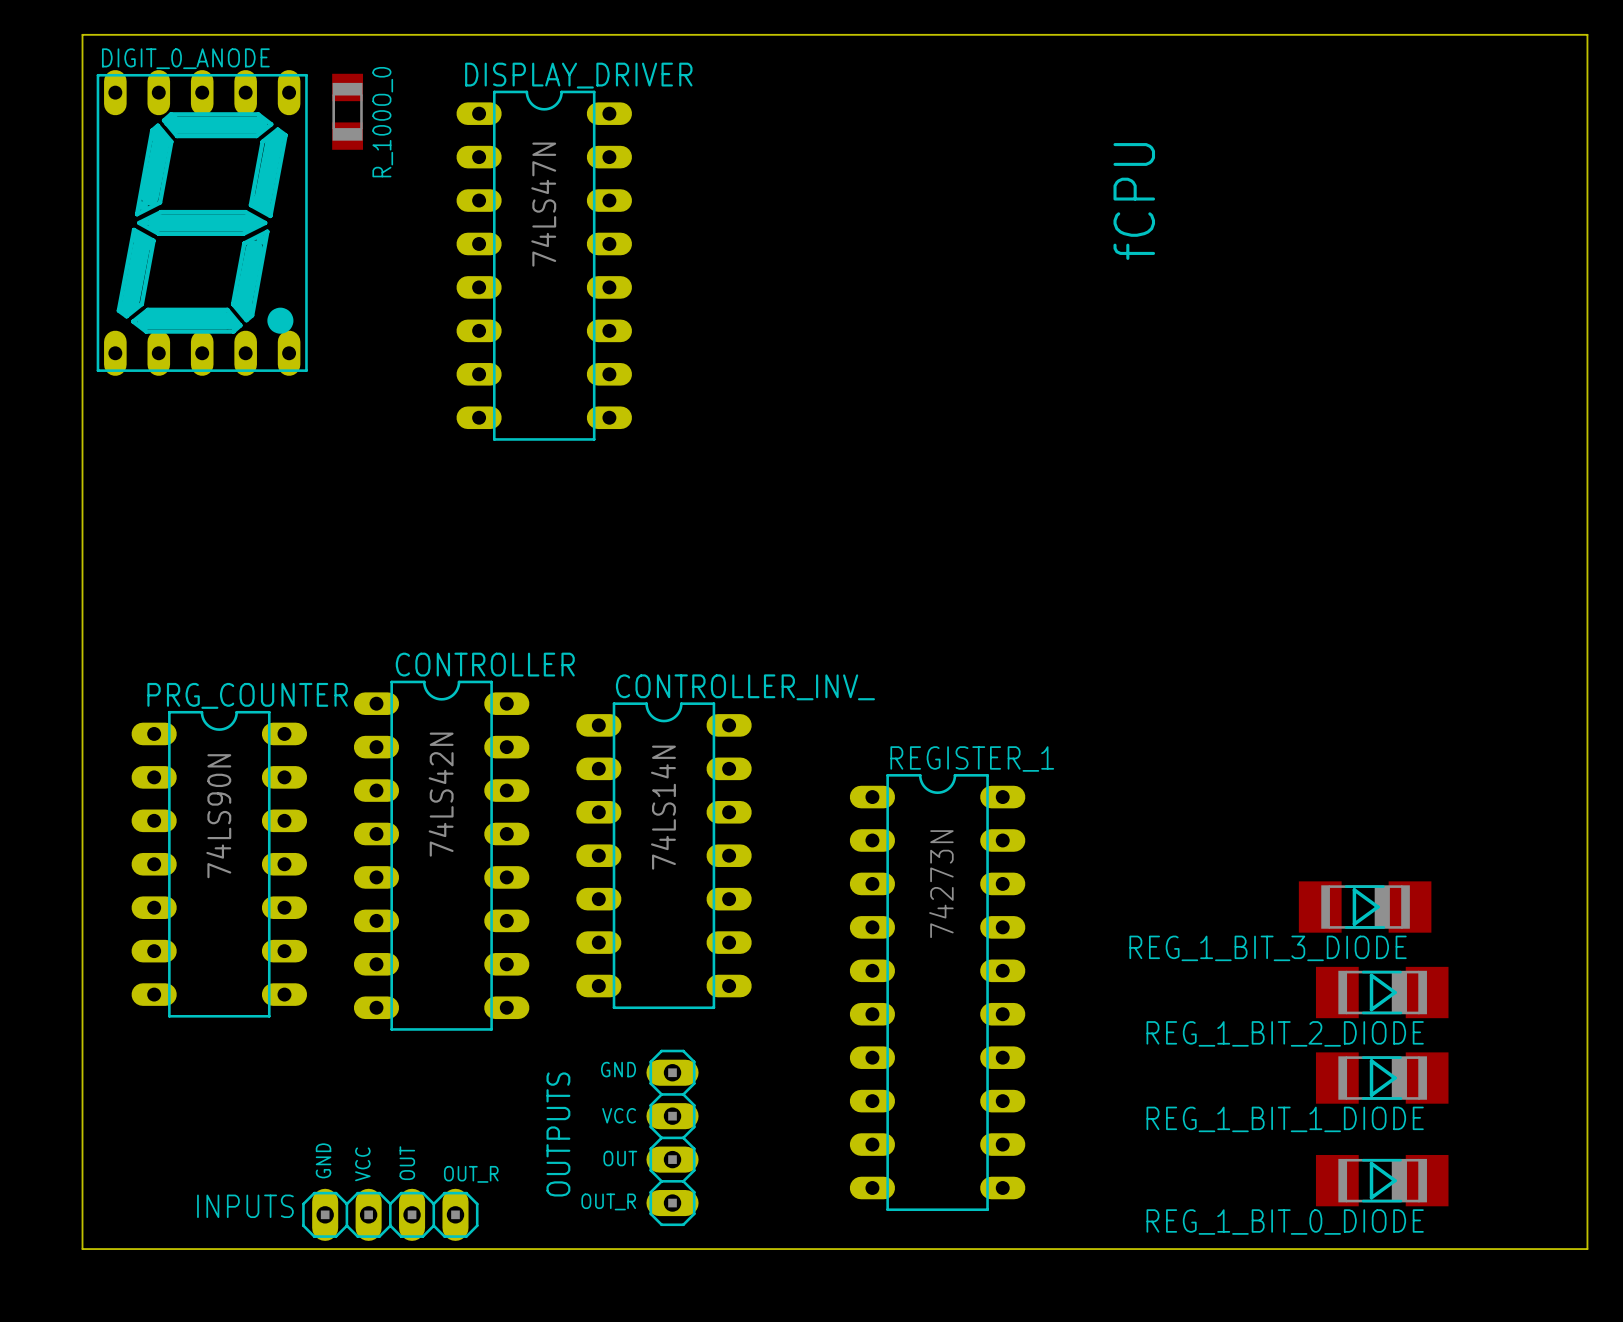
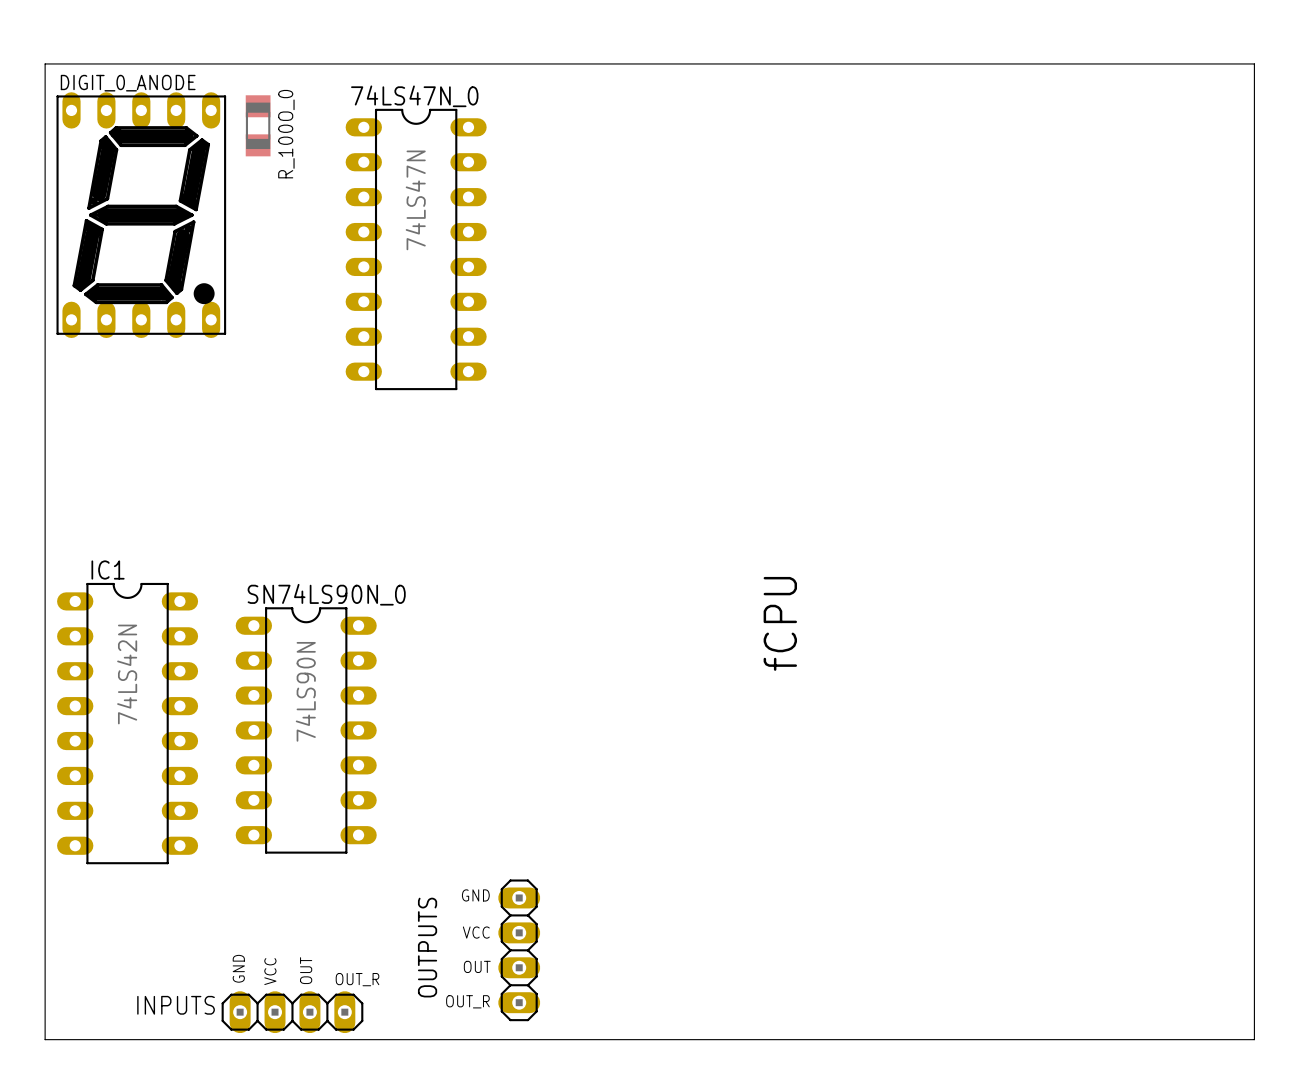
DISPLAY_DRIVER name: DISPLAY_DRIVER (578, 75) -> 74LS47N_0 (414, 96)
text: fCPU (1134, 201) -> none
text: none -> fCPU (780, 623)
IC1: none -> 74LS42N (127, 723)
CONTROLLER: 74LS42N (441, 855) -> none
CONTROLLER_INV_: 74LS14N (663, 855) -> none
PRG_COUNTER: 74LS90N (219, 864) -> none
SN74LS90N_0: none -> 74LS90N (306, 730)
REG_1_BIT_3_DIODE: (1365, 907) -> none
REGISTER_1: 74273N (937, 992) -> none
REG_1_BIT_2_DIODE: (1382, 992) -> none
REG_1_BIT_1_DIODE: (1382, 1078) -> none
REG_1_BIT_0_DIODE: (1382, 1180) -> none

